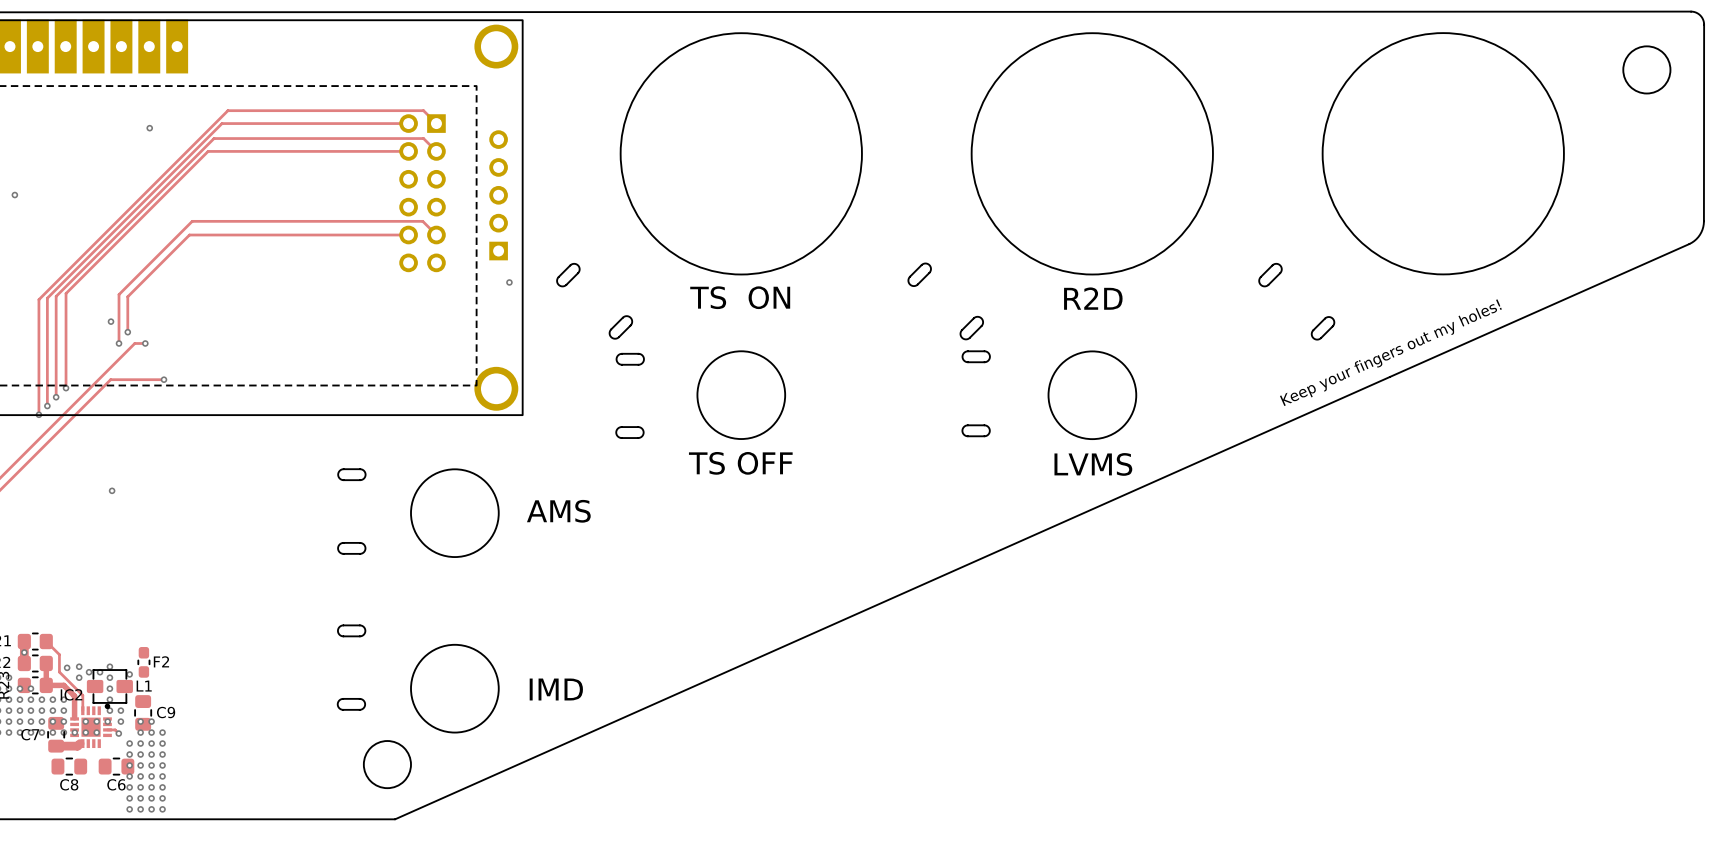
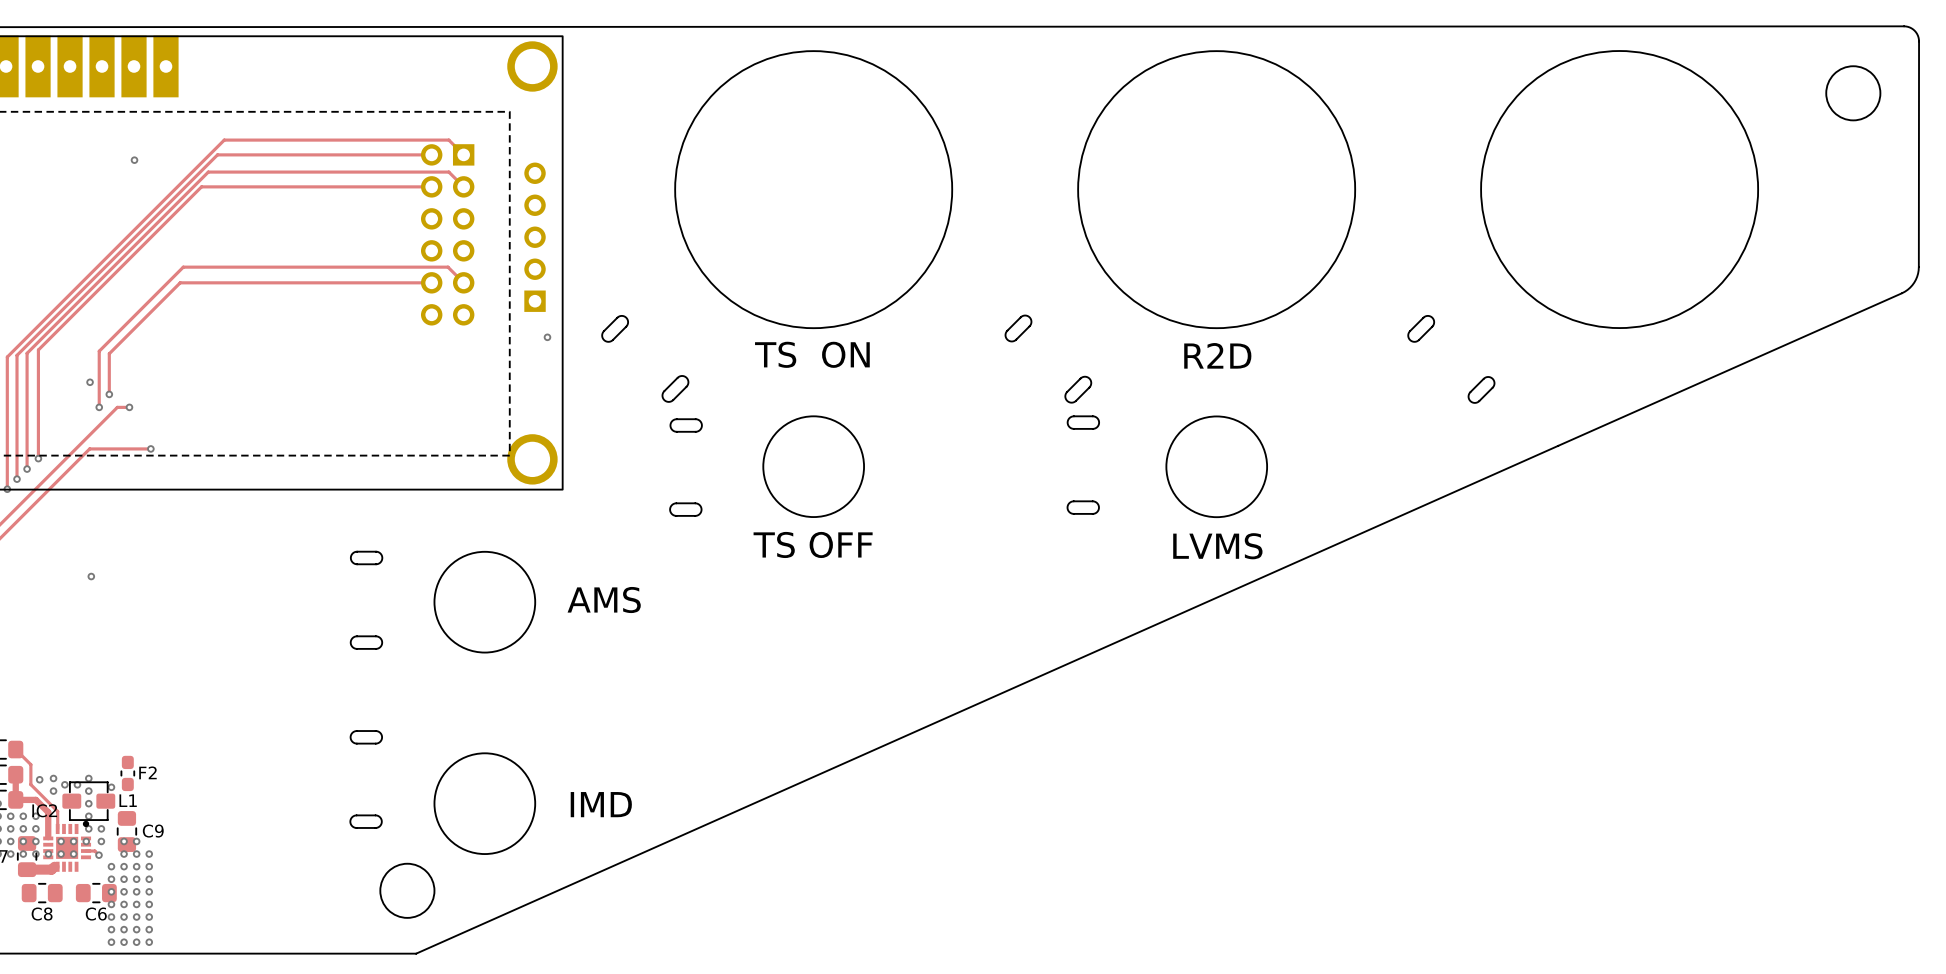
text: Keep your fingers out my holes! (1390, 352) -> none

